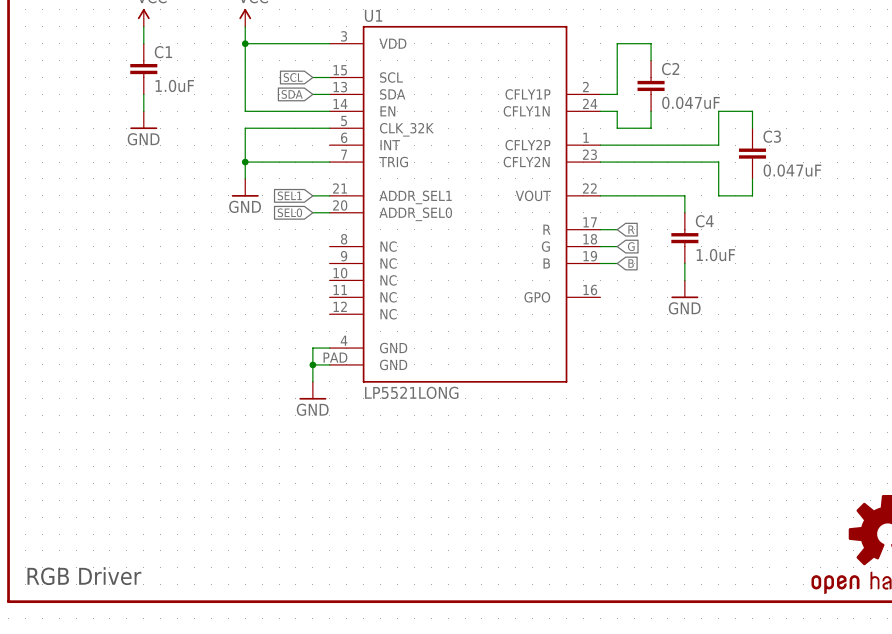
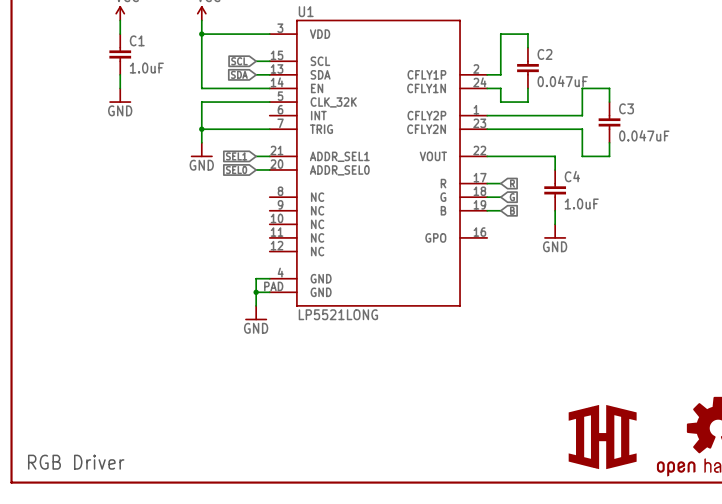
part: none -> (602, 437)

